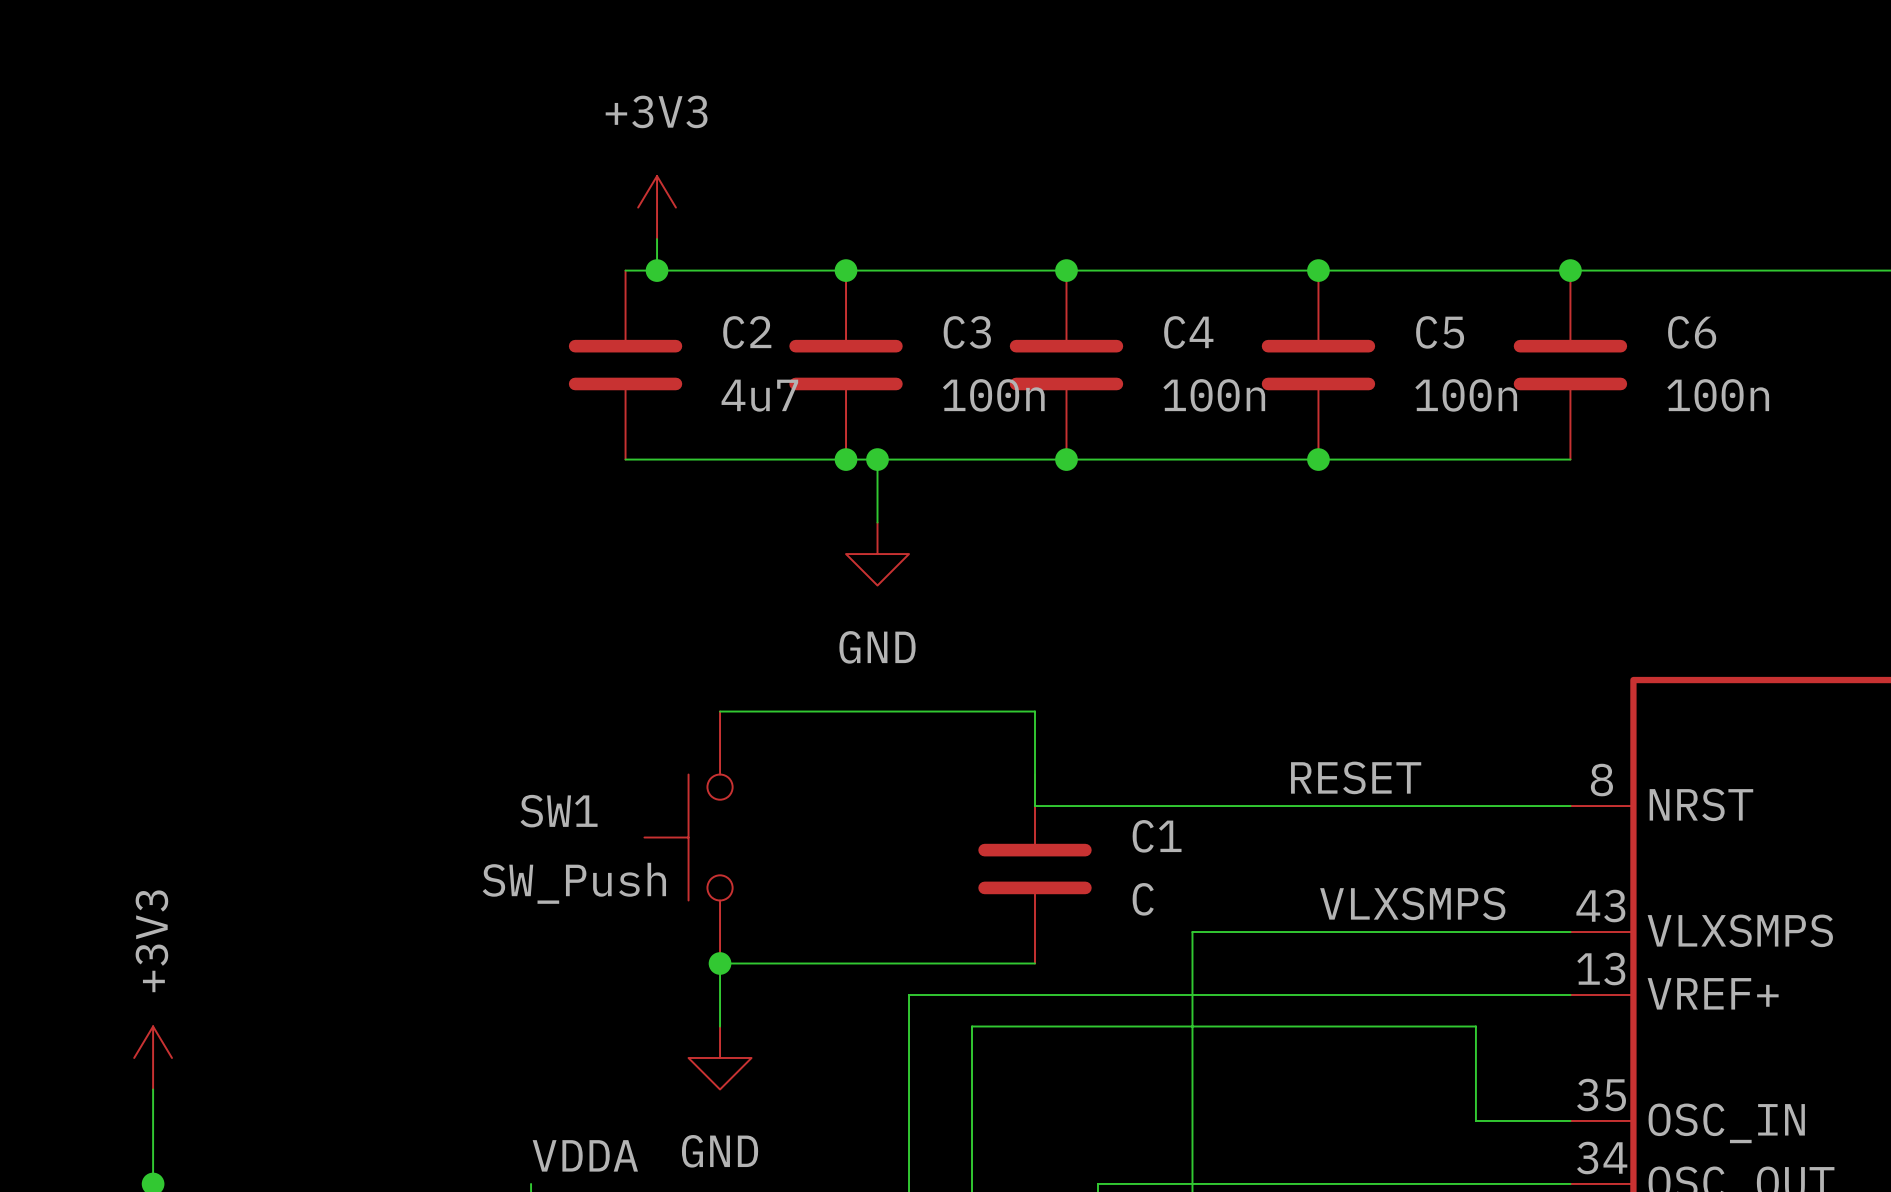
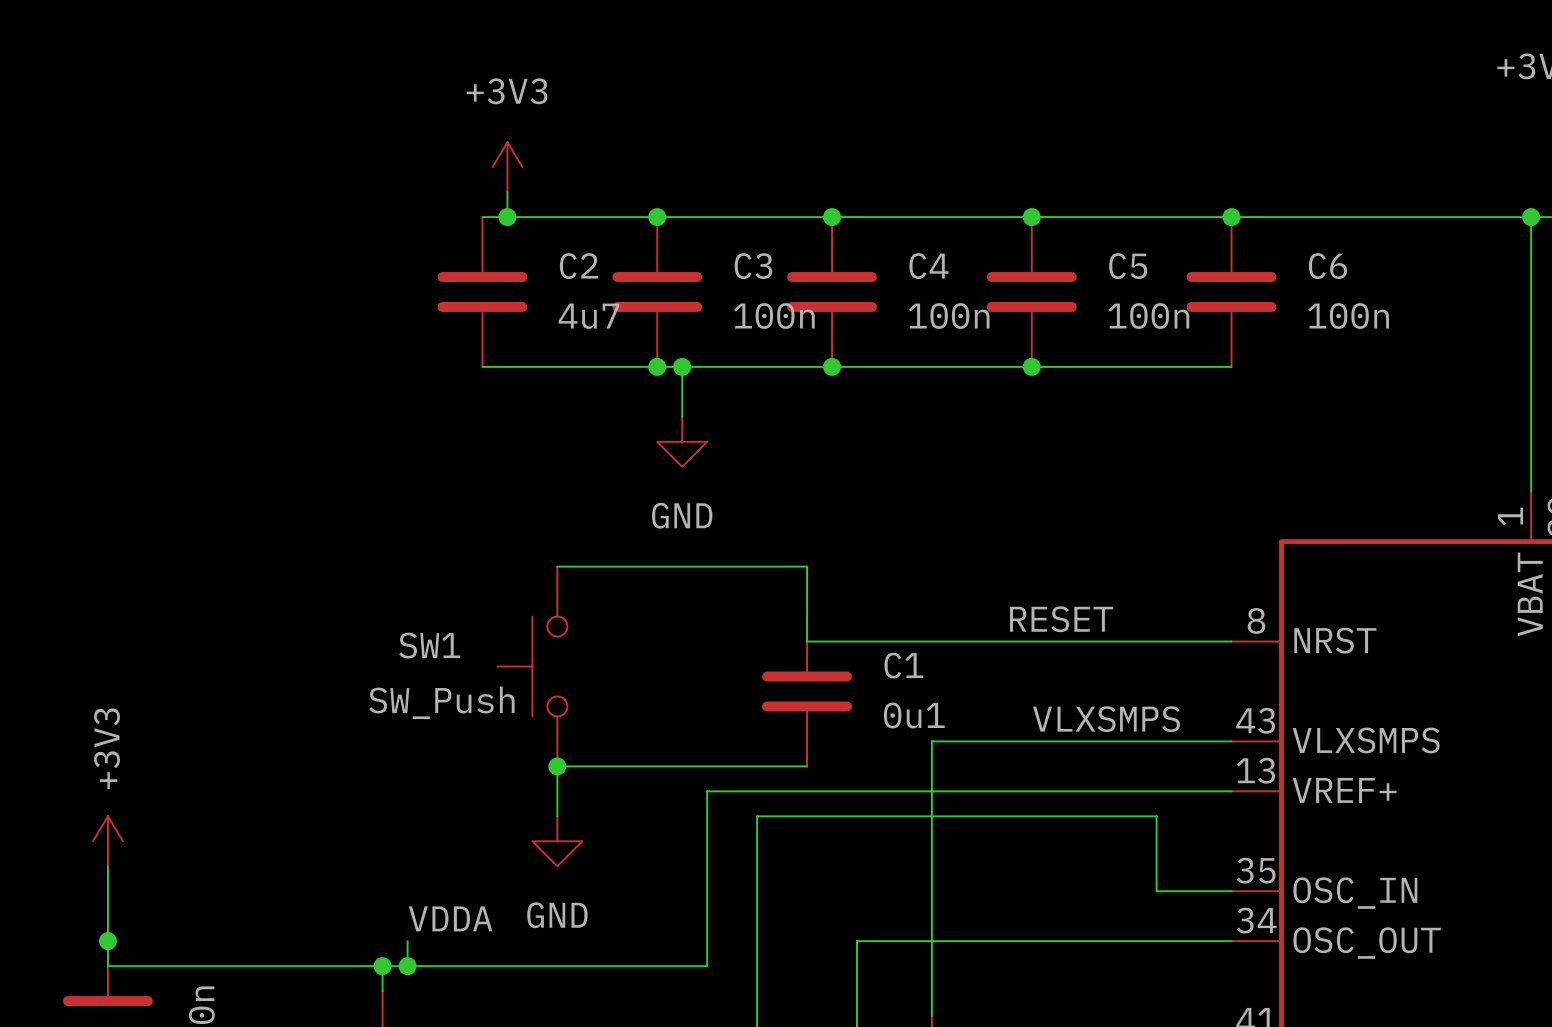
C1 value: C (1143, 899) -> 0u1 (914, 715)

